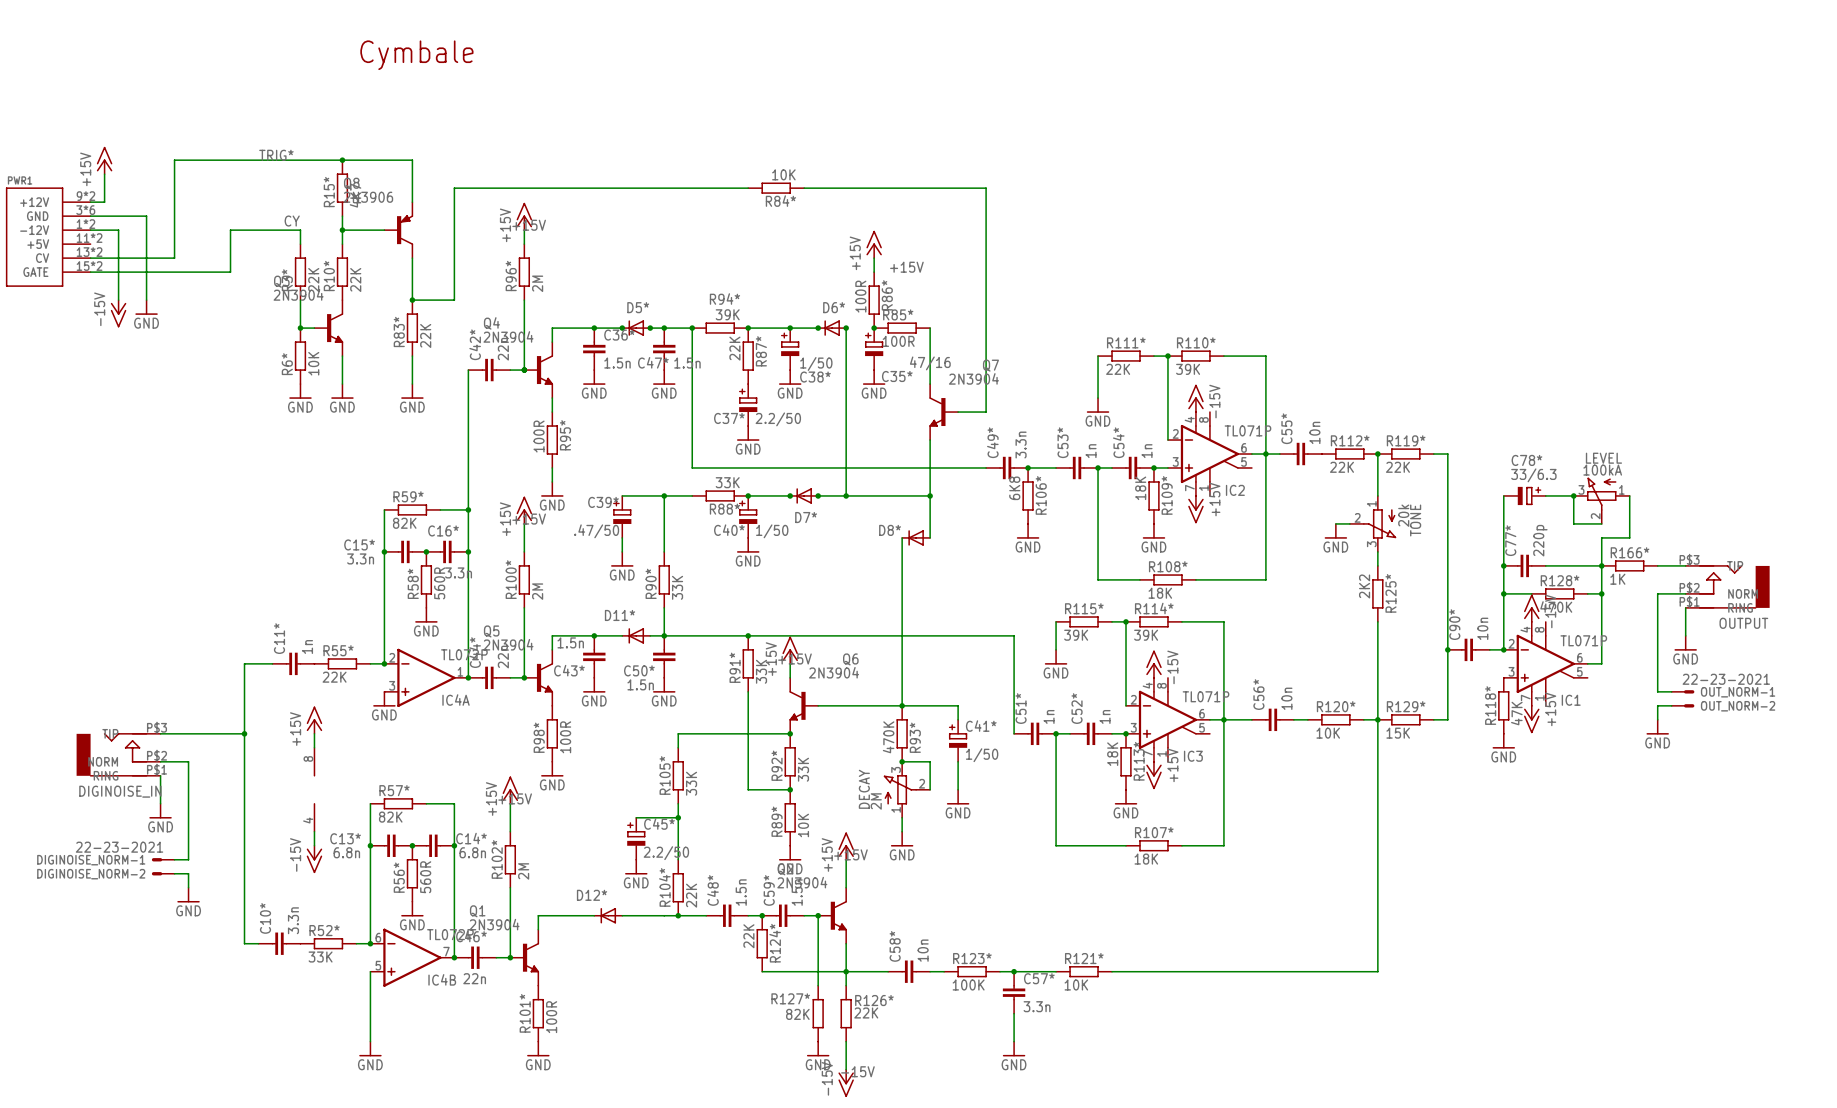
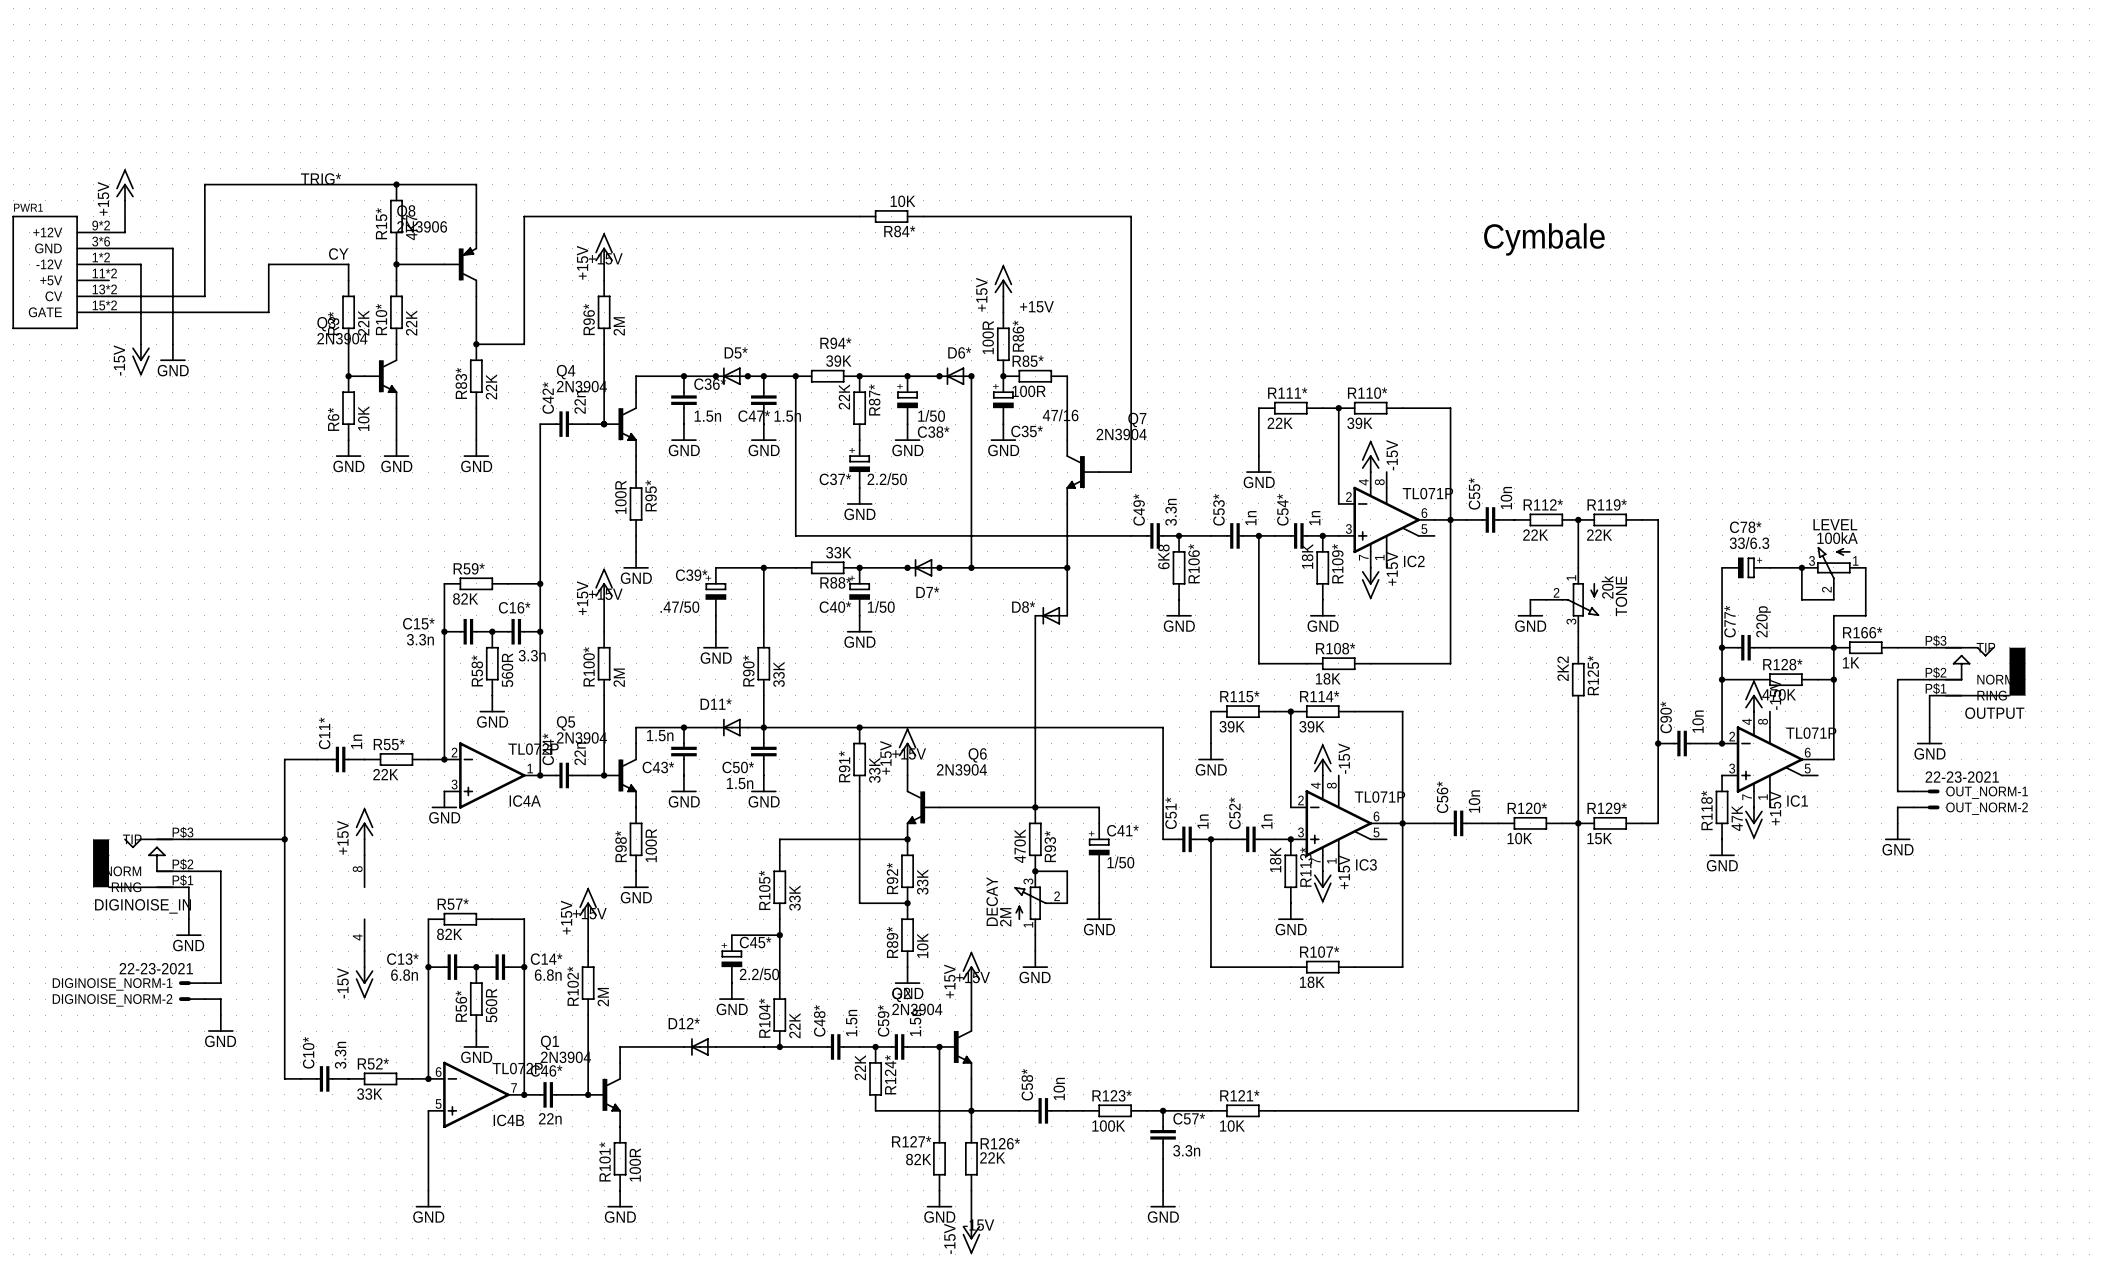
text: Cymbale (416, 55) -> none
text: none -> Cymbale (1544, 239)

